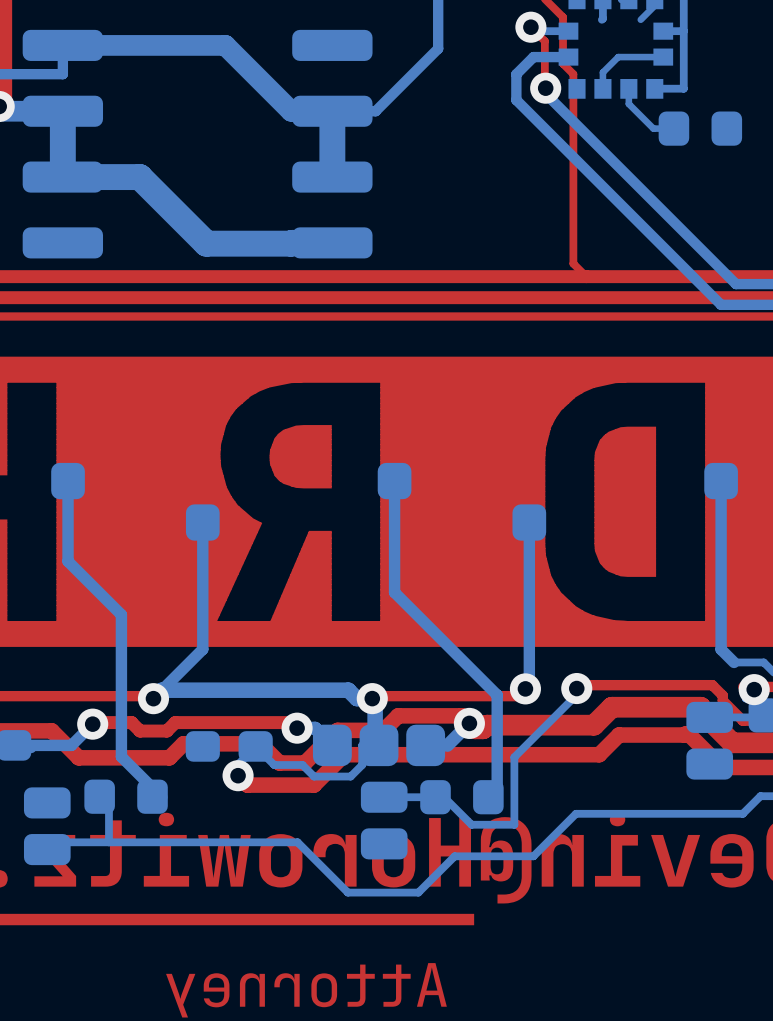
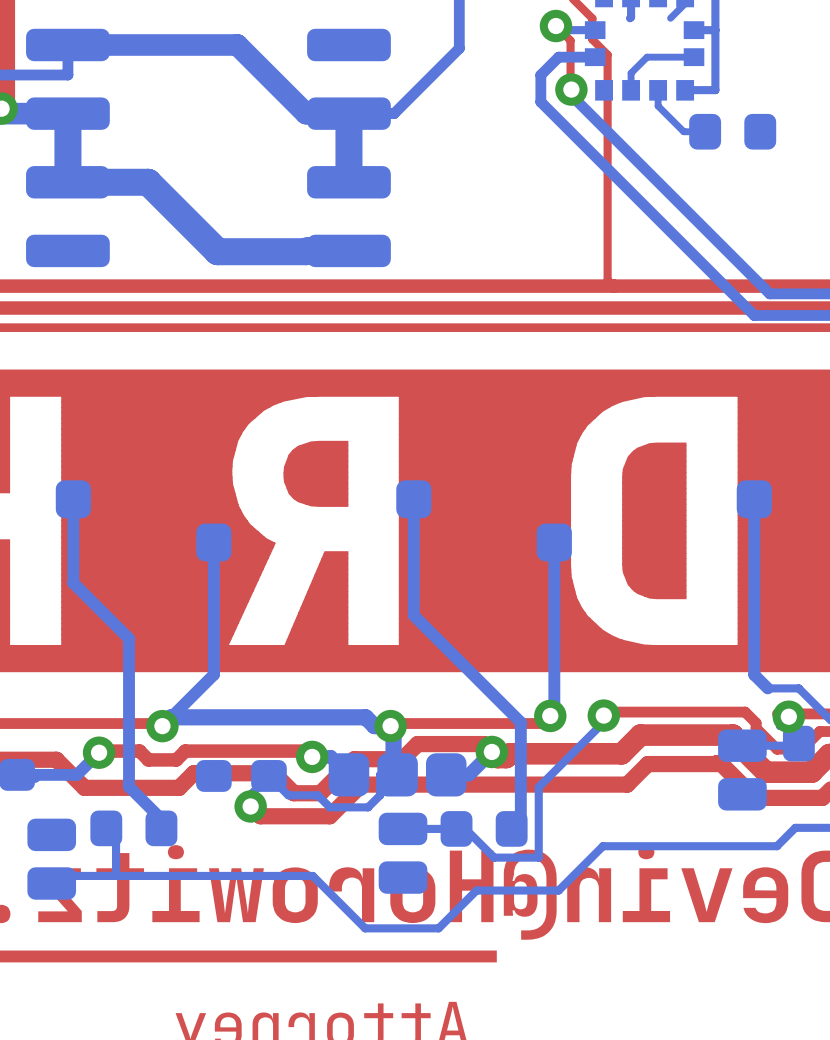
top track: (563, 17) (563, 63) (573, 74) (573, 263) (580, 270) -> (589, 15) (592, 18) (592, 39) (607, 54) (607, 279)

